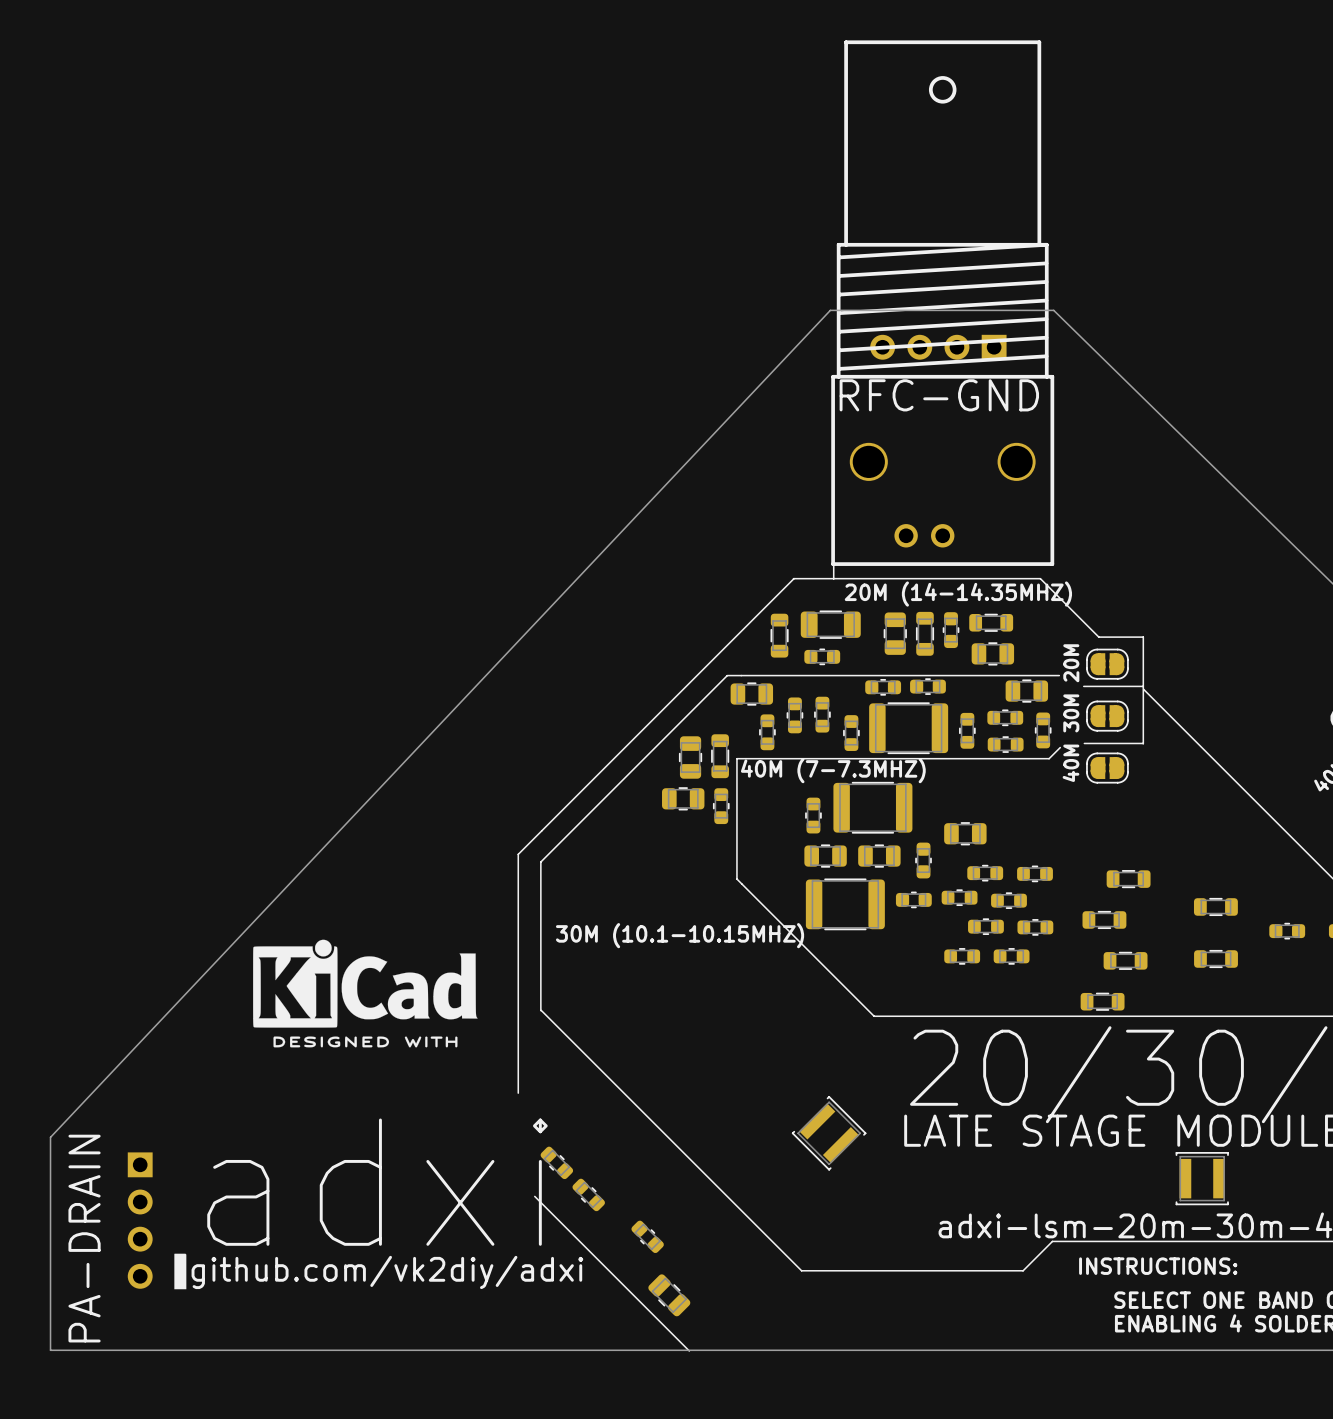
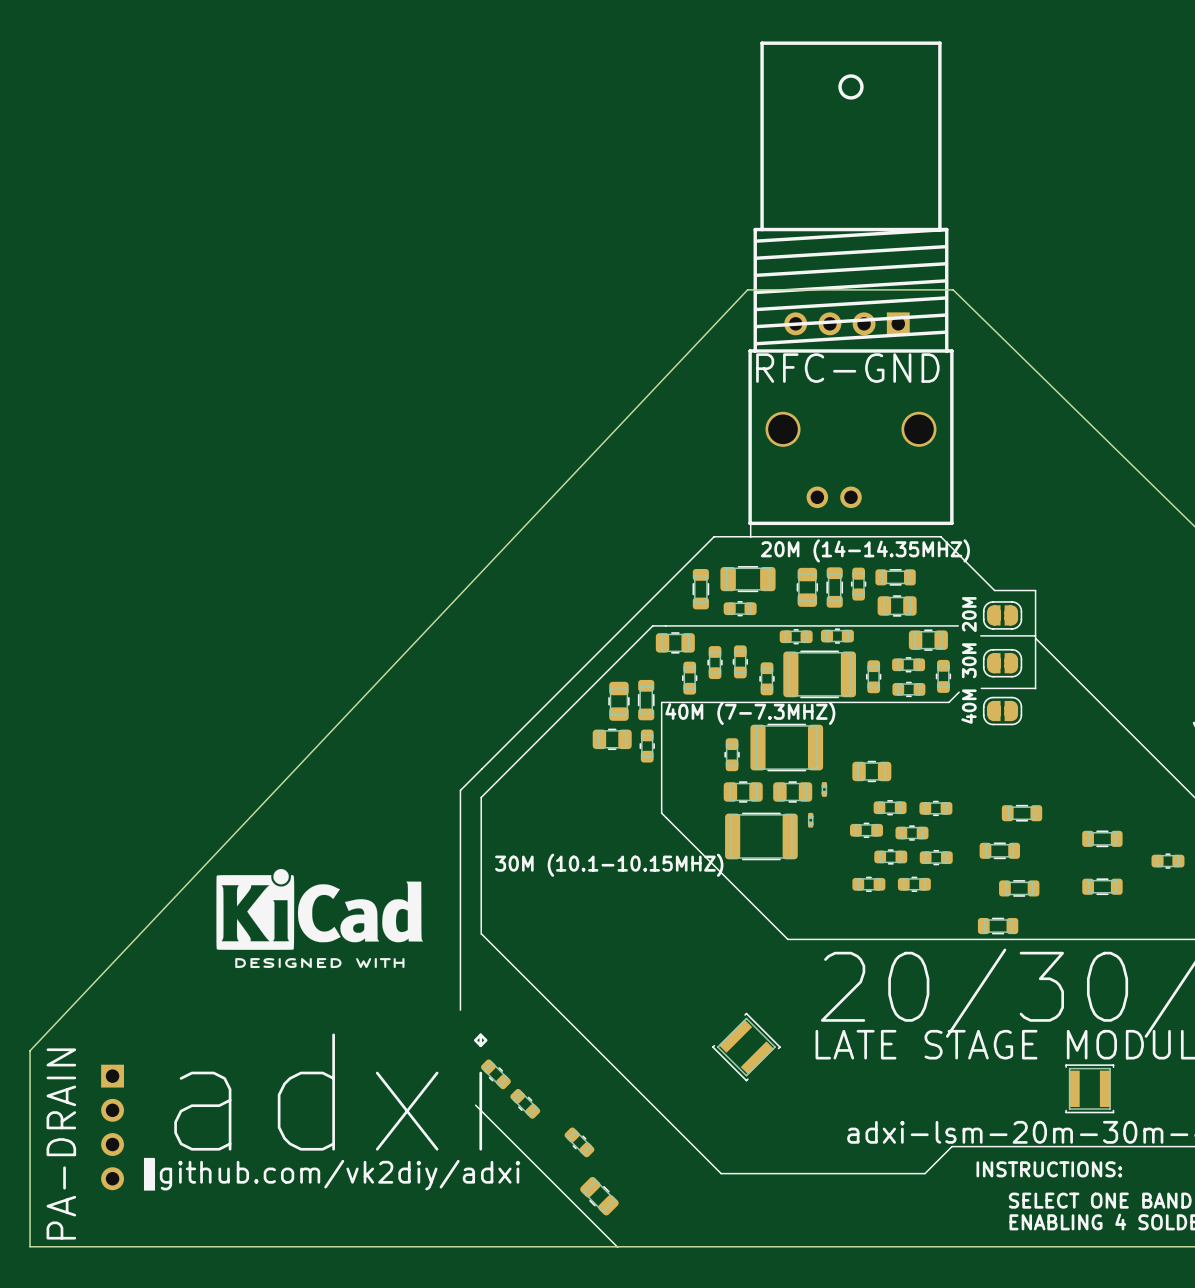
part footprint: [915, 842, 932, 879] -> [821, 782, 828, 797]
part: none -> (810, 820)
part: (913, 899) -> none

